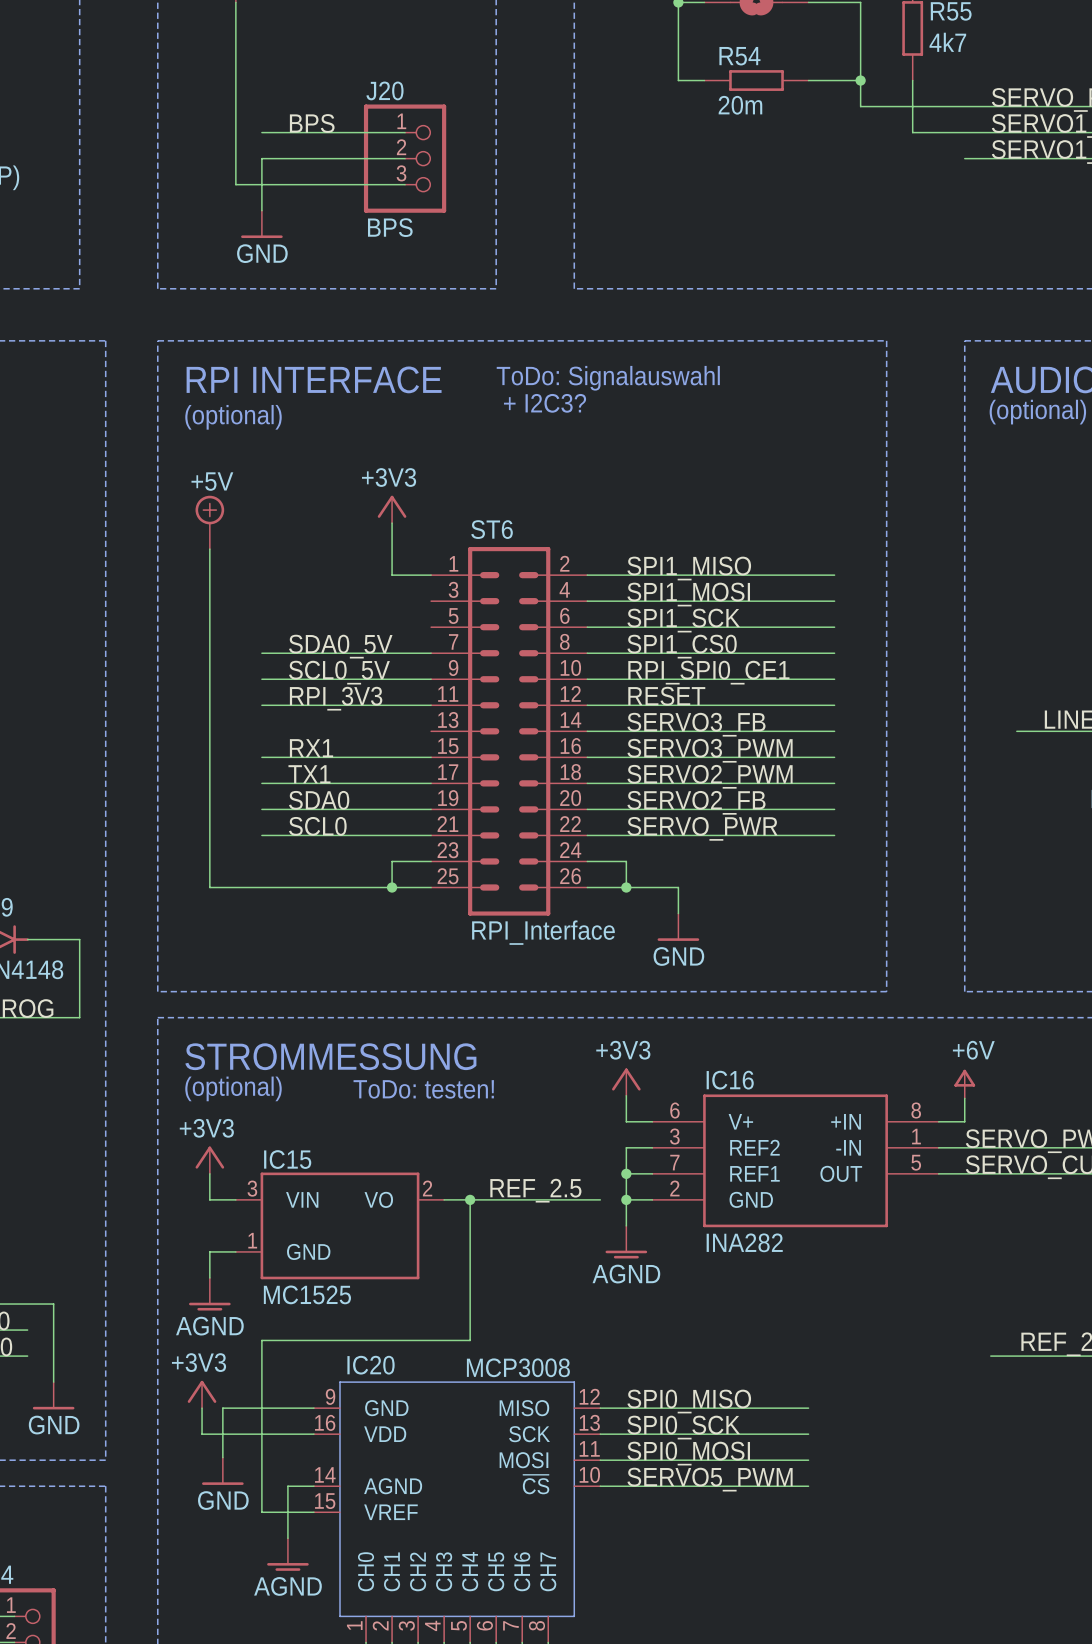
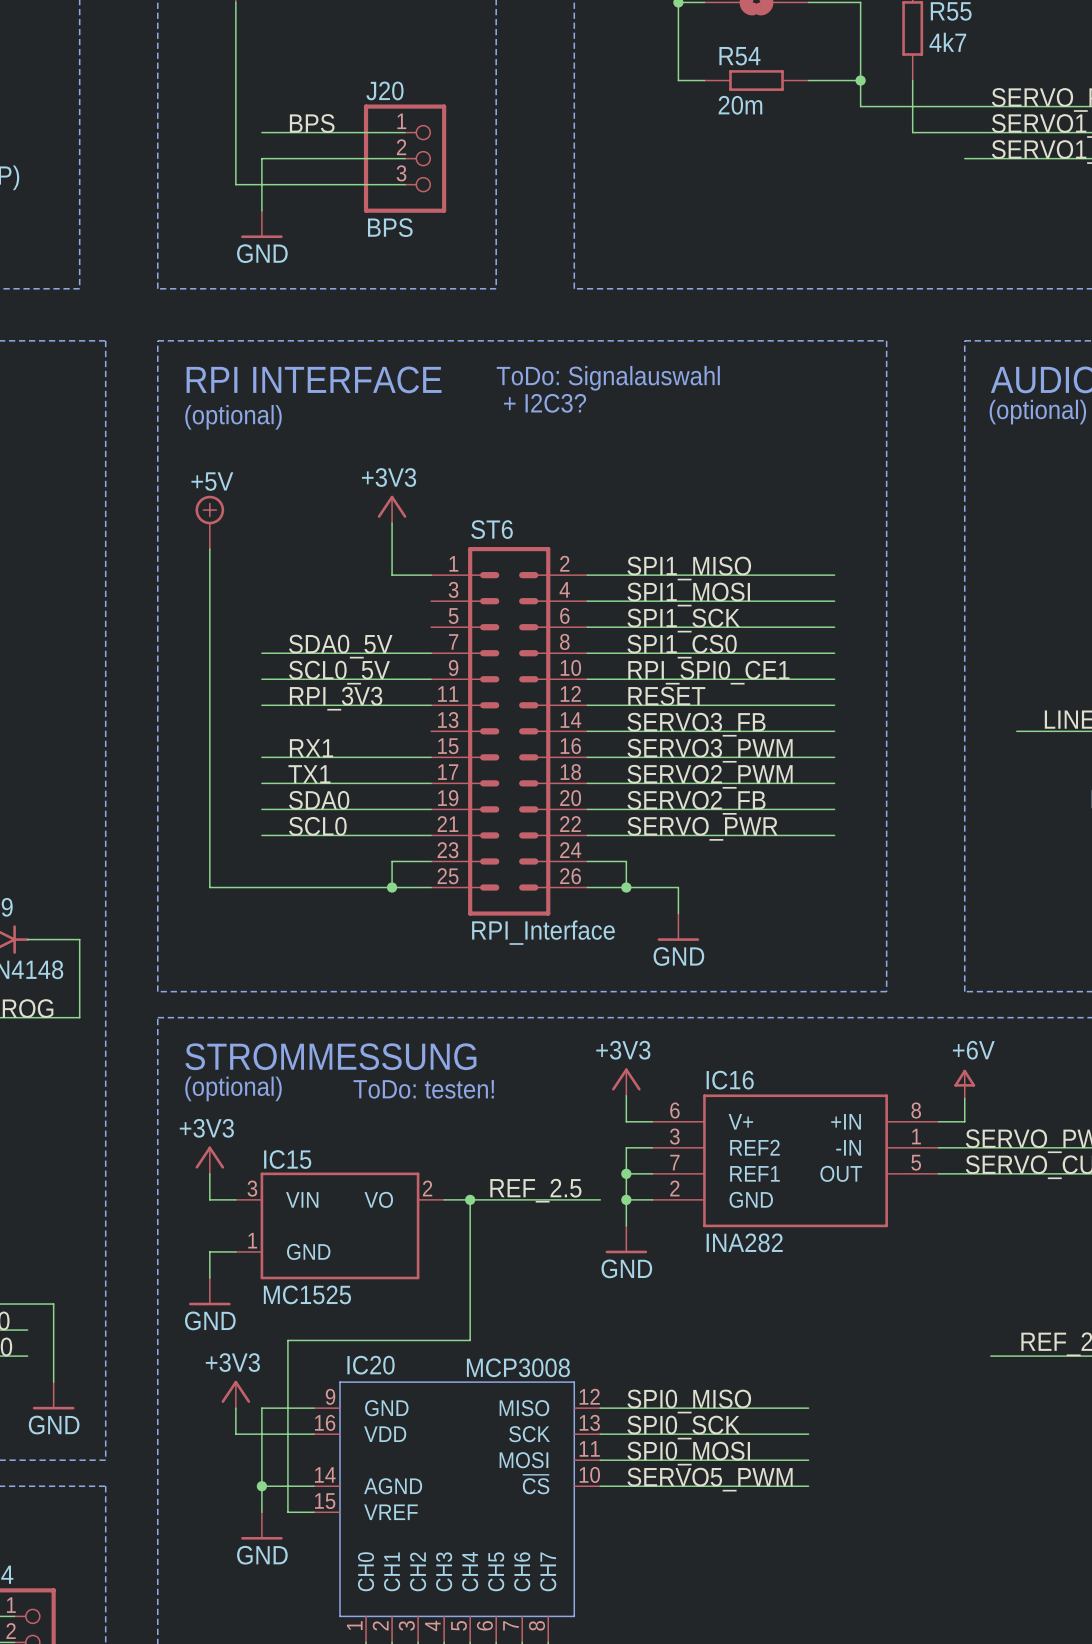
power symbol: AGND (626, 1242) -> GND (626, 1239)
power symbol: AGND (209, 1294) -> GND (209, 1291)
wire: (287, 1340) (261, 1340) (261, 1408) (222, 1408) (222, 1457) -> (287, 1340) (287, 1486) (261, 1486)
power symbol position: +3V3 (202, 1394) -> +3V3 (235, 1394)
wire: (202, 1408) (202, 1434) (235, 1434) -> (235, 1408) (235, 1434)
power symbol position: GND (222, 1471) -> GND (261, 1525)
junction: none -> (261, 1486)
wire: (261, 1512) (287, 1512) (287, 1538) -> none
power symbol: AGND (287, 1554) -> none

